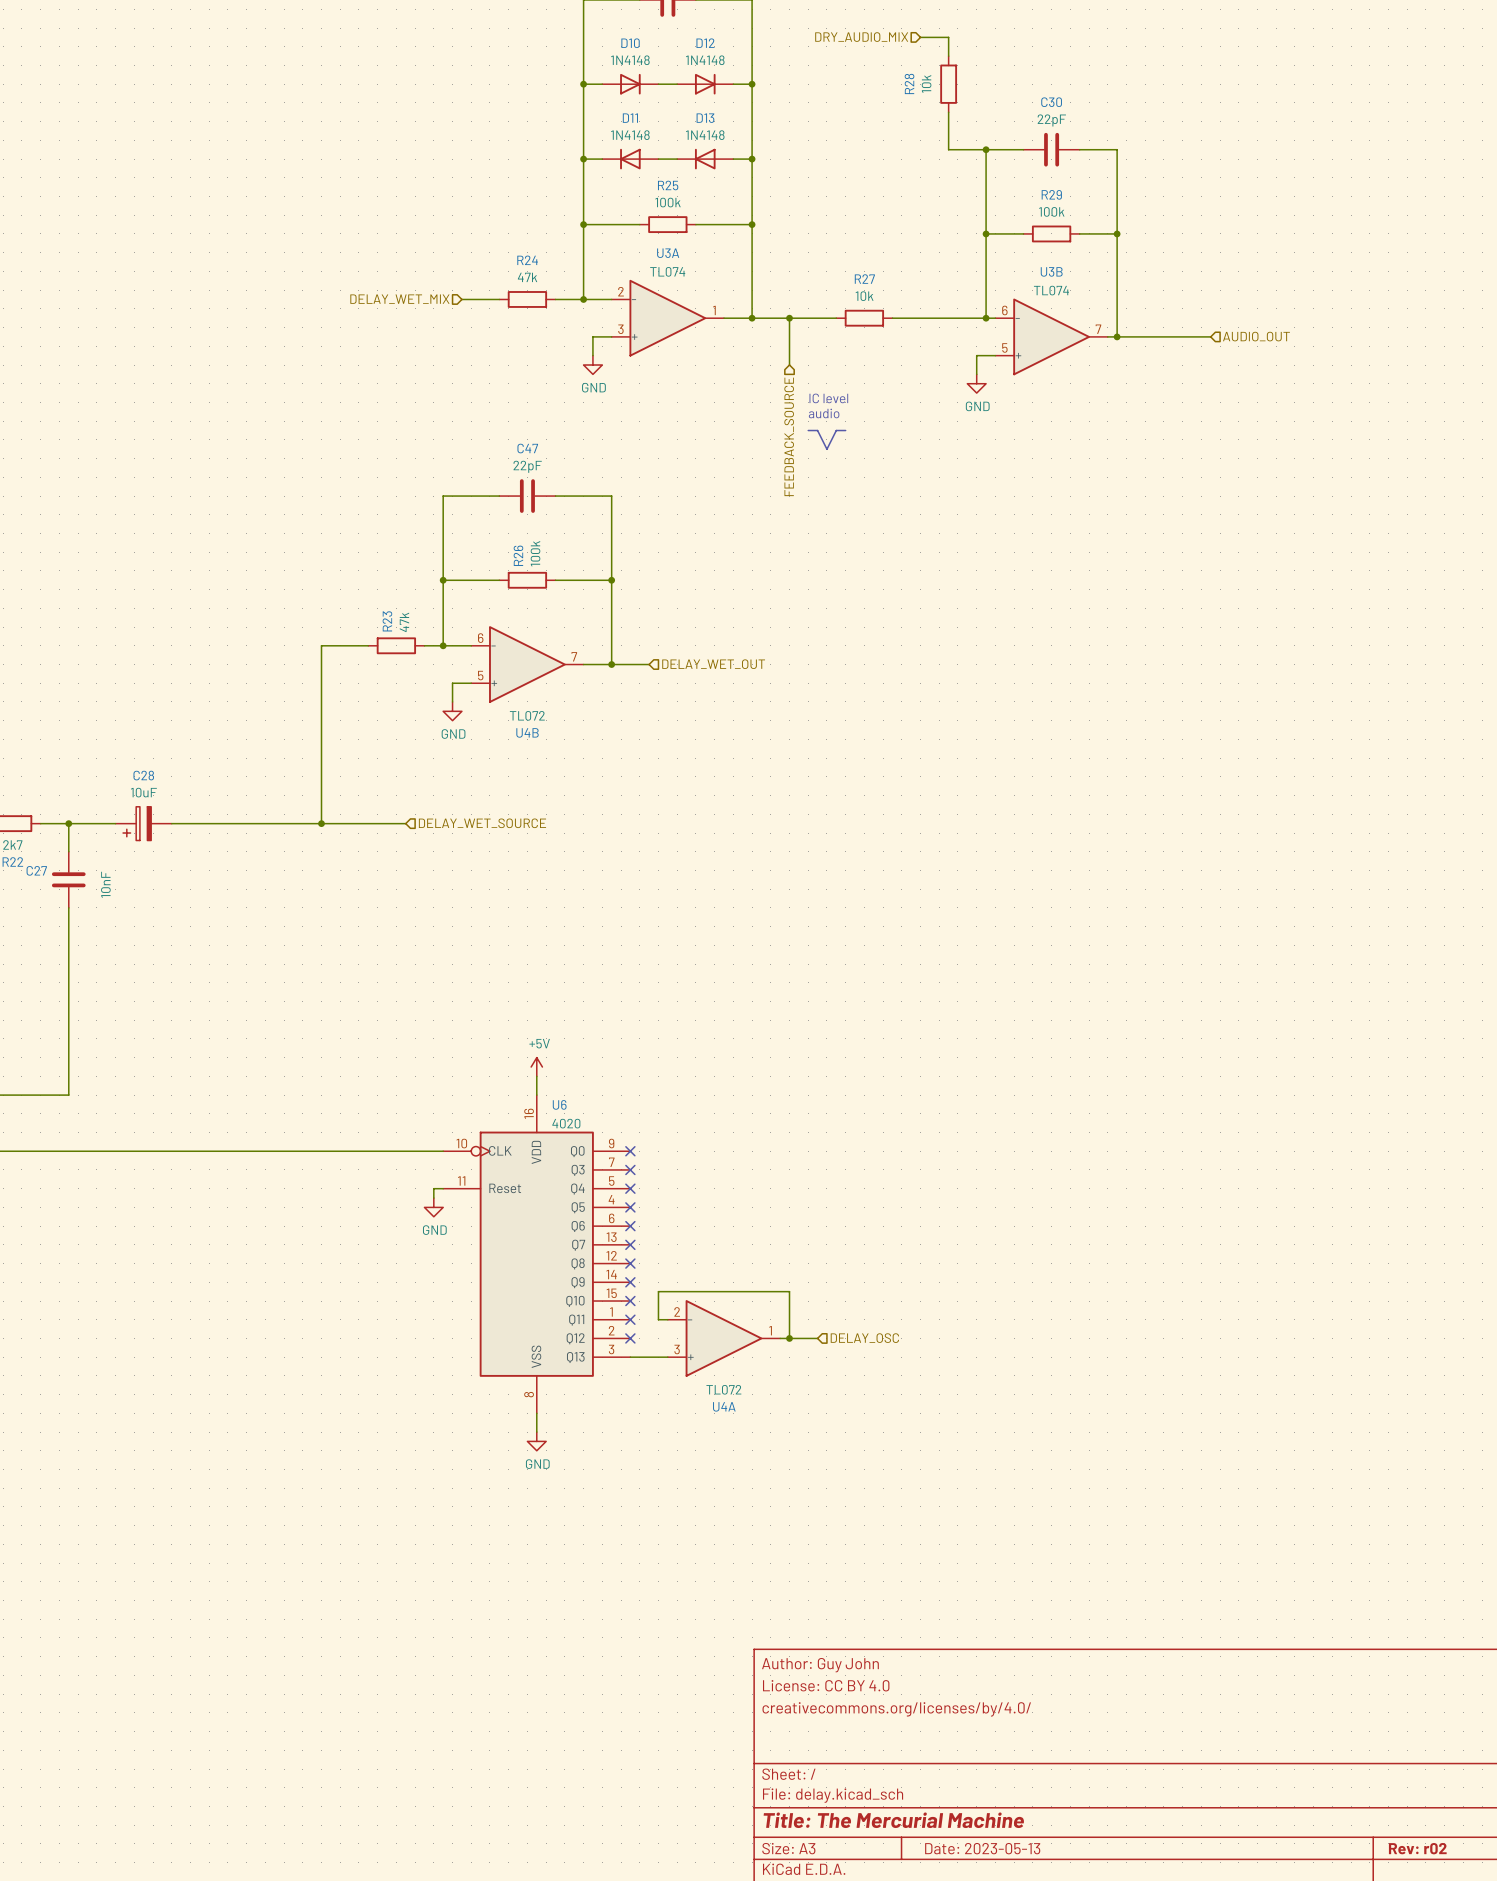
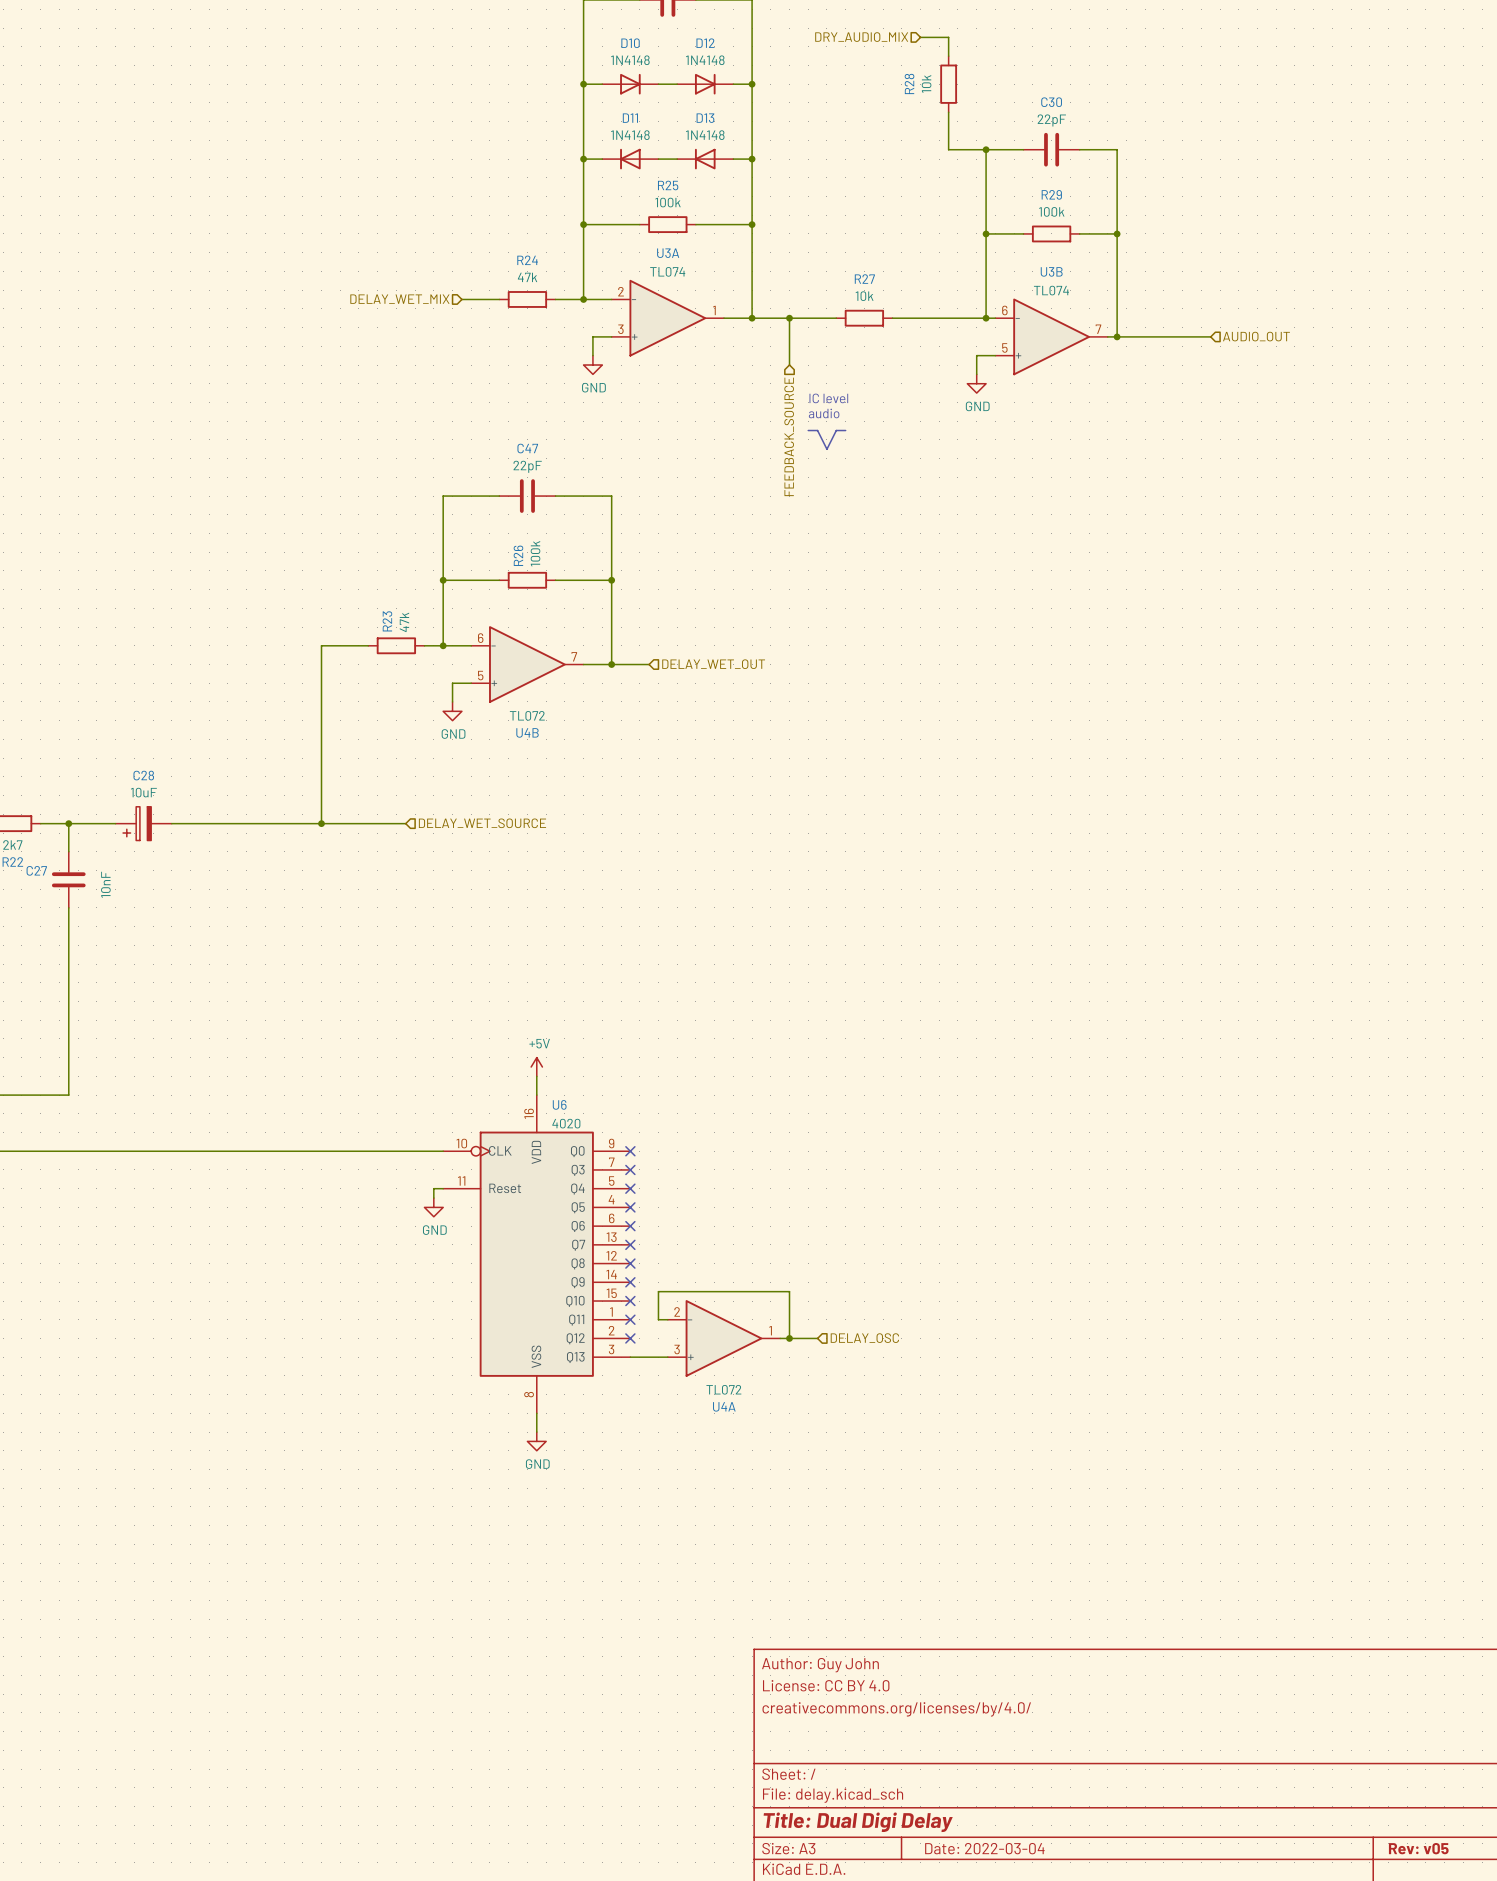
title block: Title: The Mercurial Machine (893, 1820) -> Title: Dual Digi Delay (858, 1822)
title block: Date: 2023-05-13 (982, 1848) -> Date: 2022-03-04 (984, 1848)
title block: Rev: r02 (1417, 1848) -> Rev: v05 (1418, 1848)

